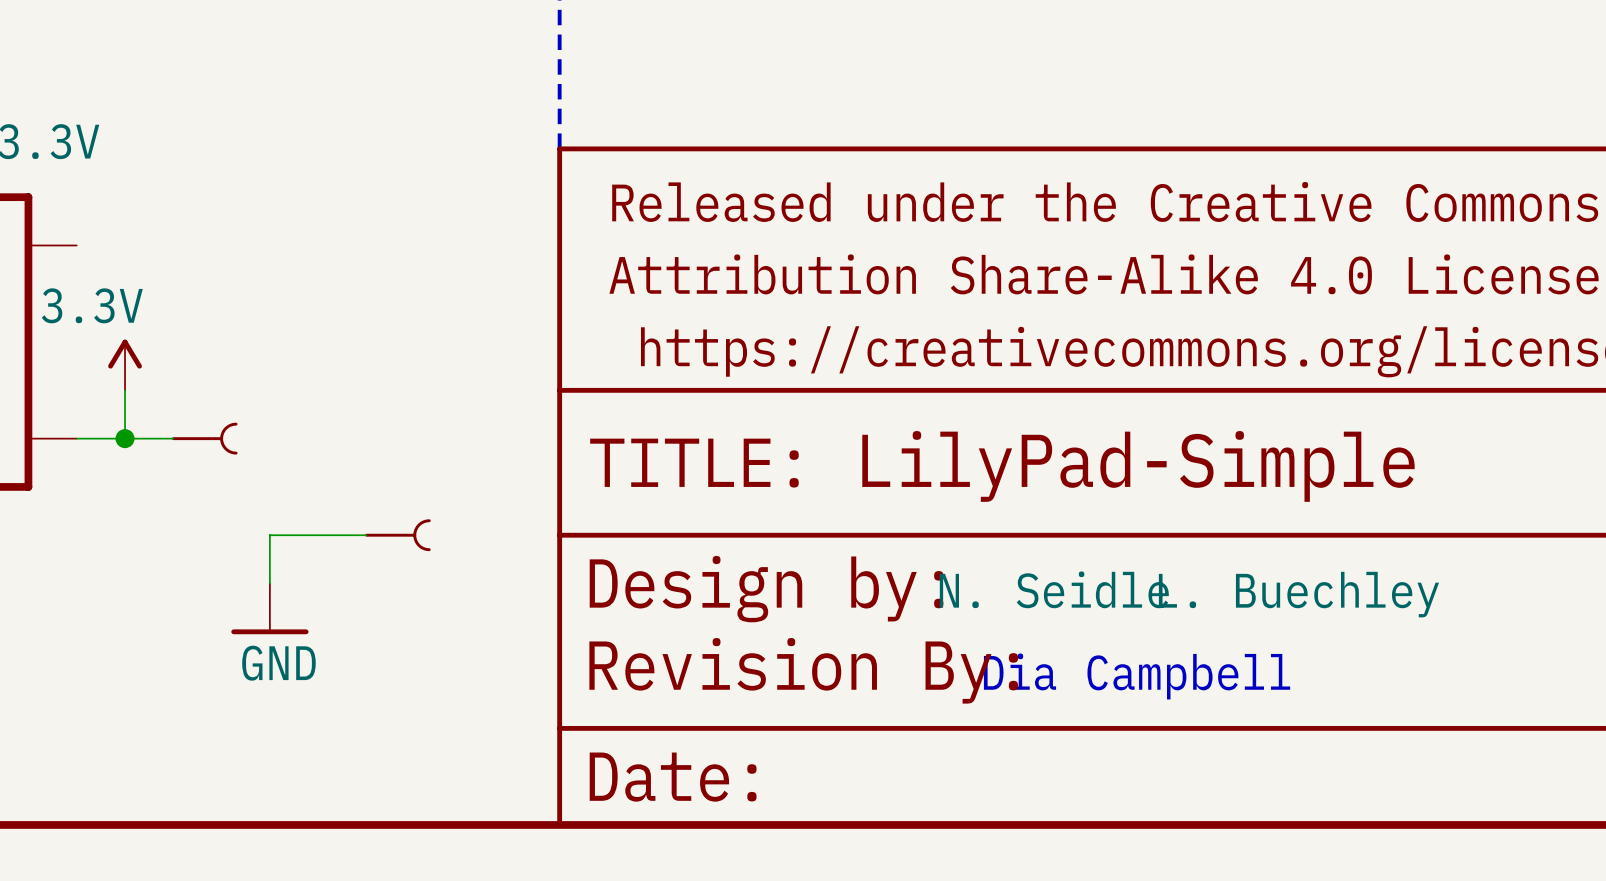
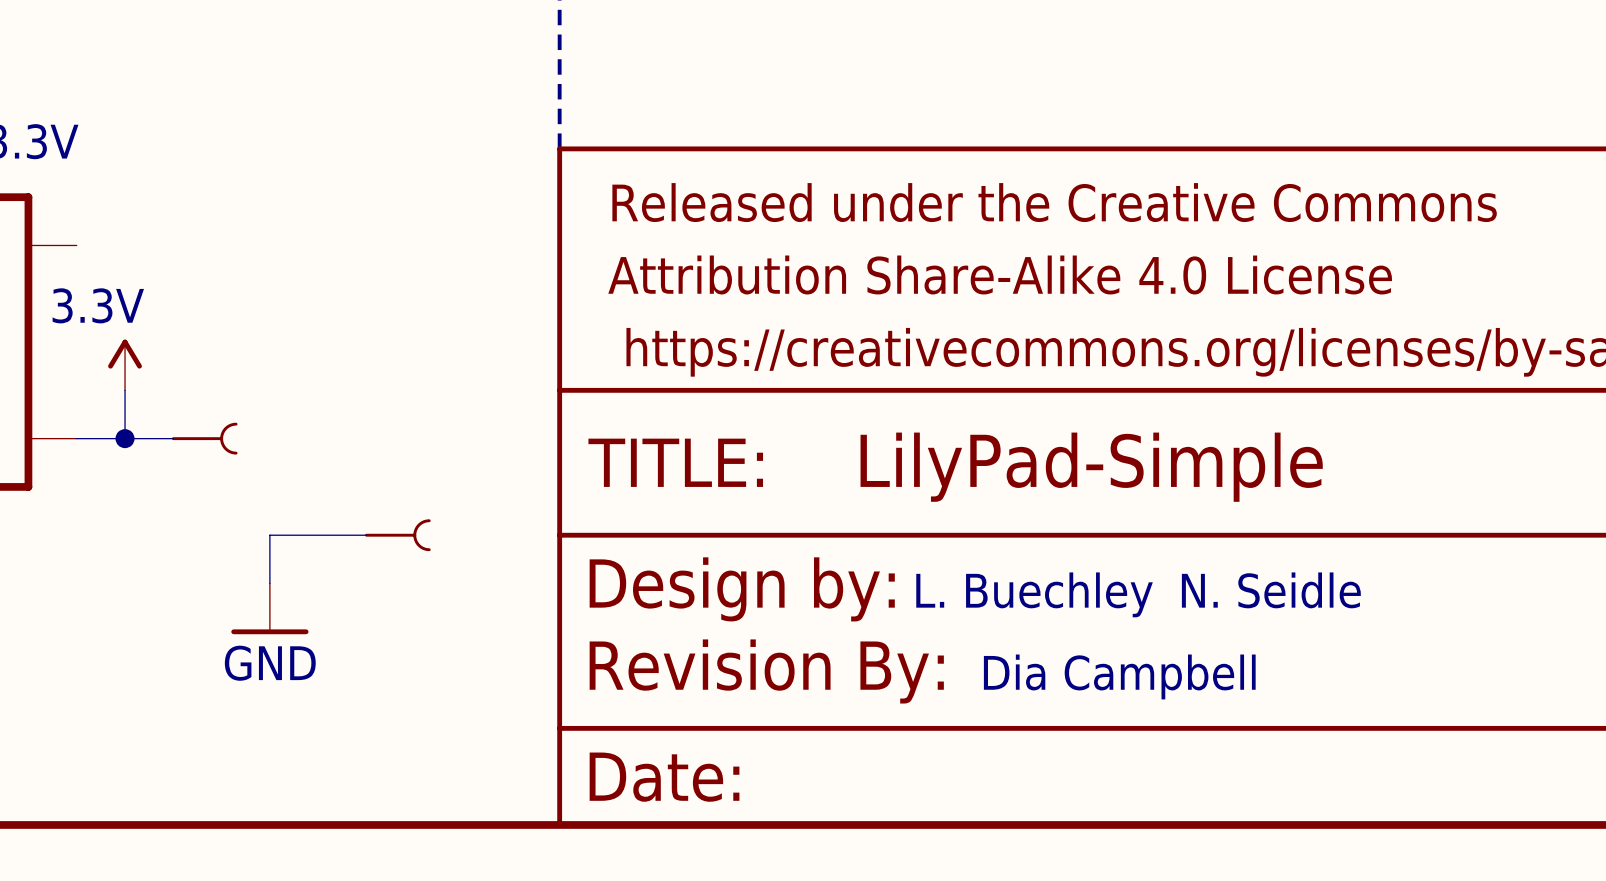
text position: N. Seidle (1054, 589) -> N. Seidle (1271, 590)
text position: L. Buechley (1298, 594) -> L. Buechley (1034, 594)

